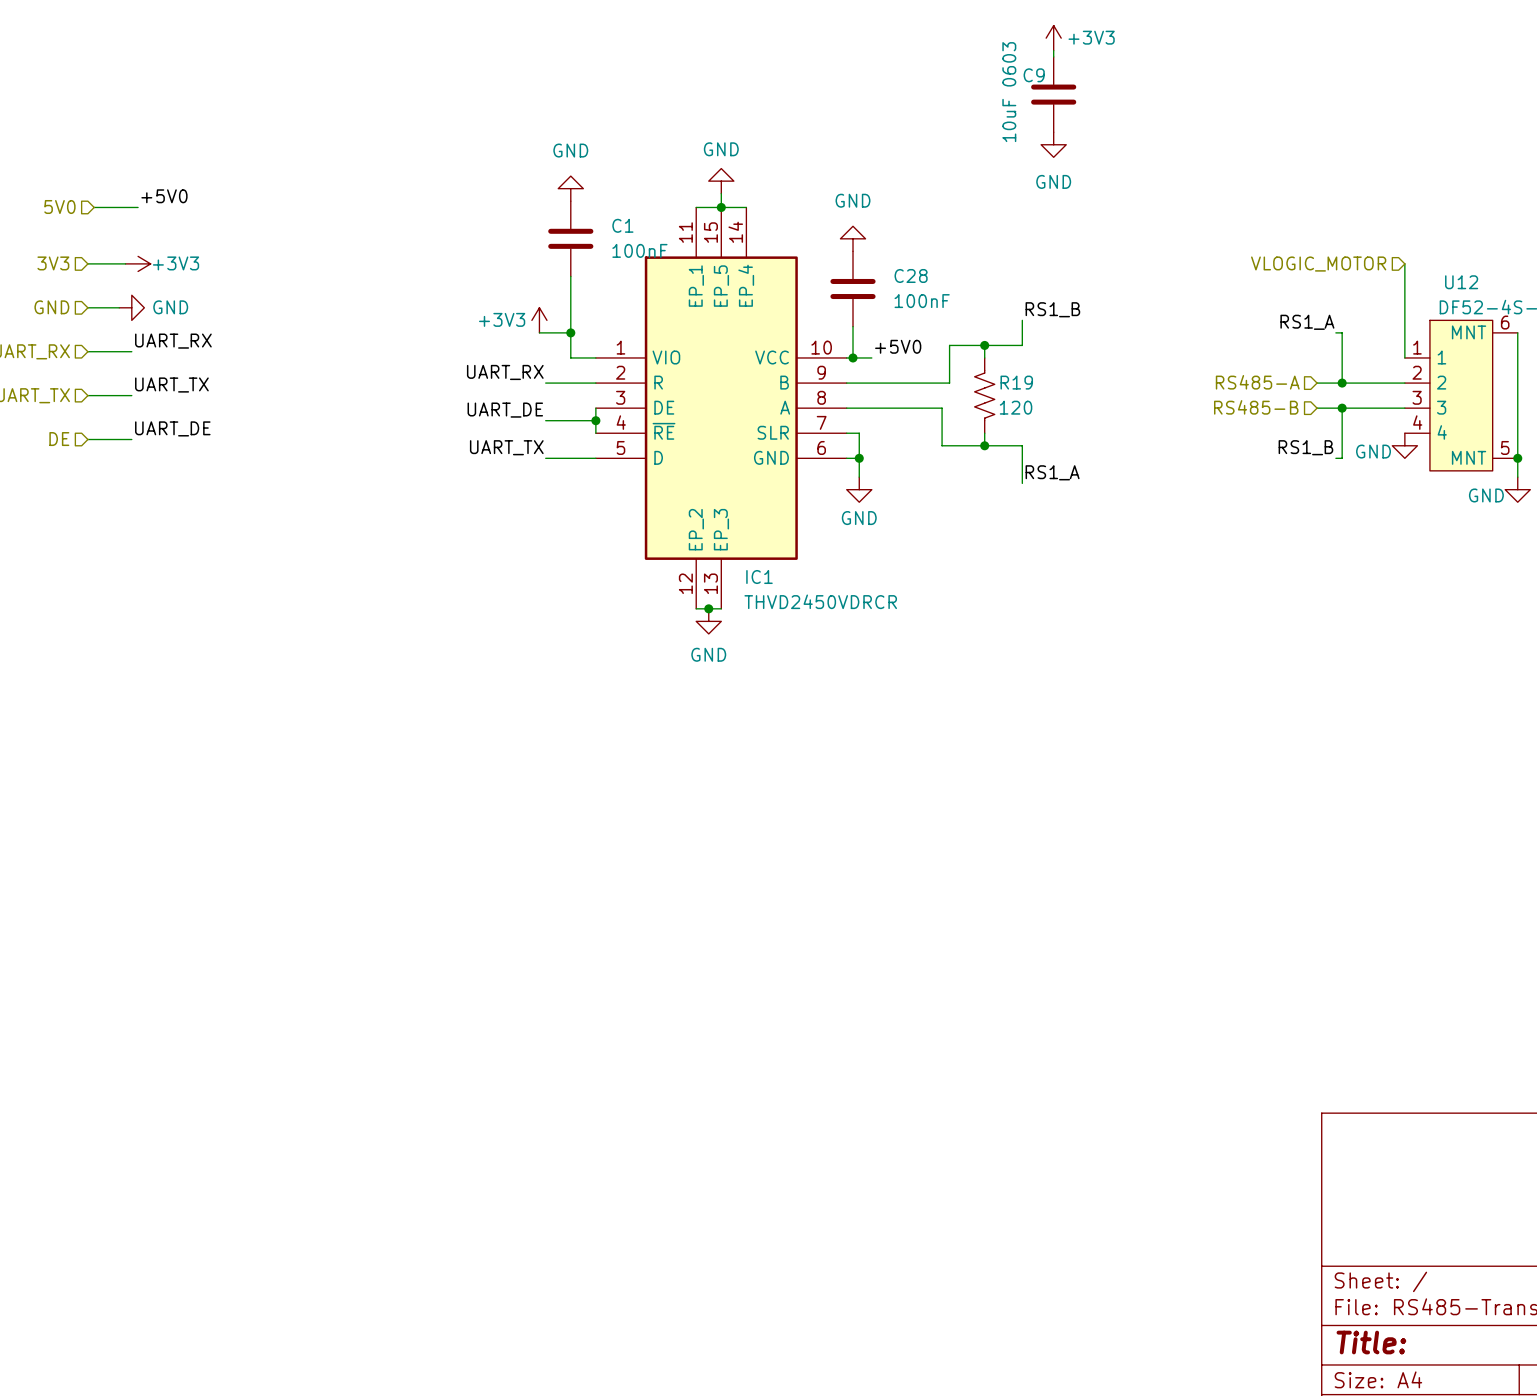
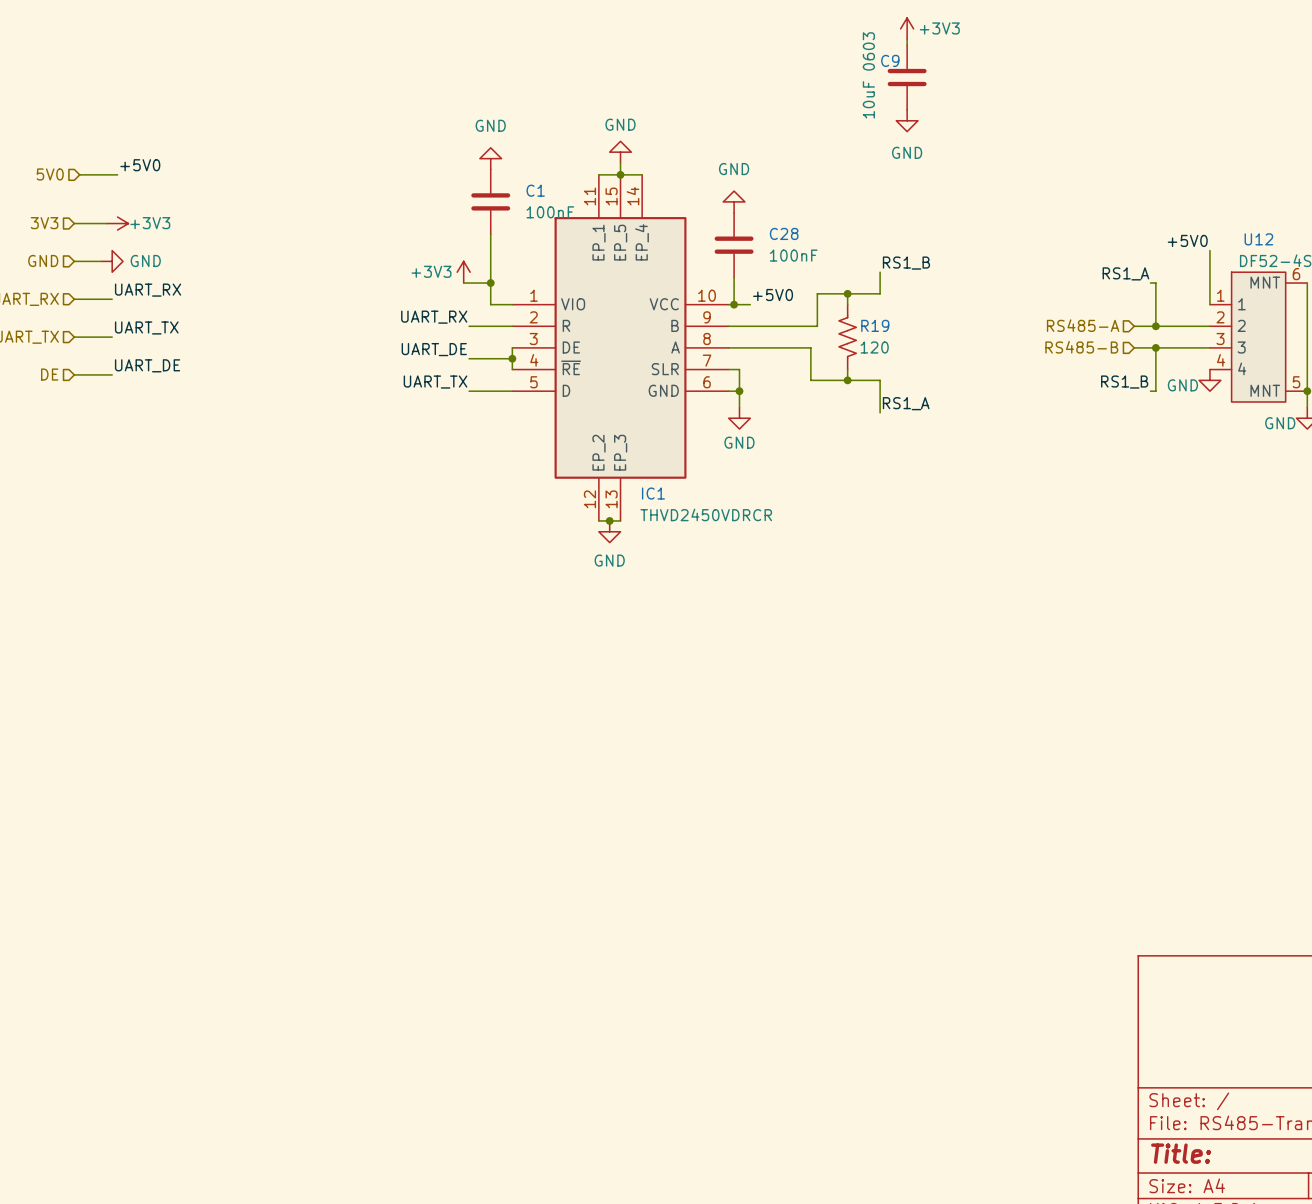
wire: (1404, 263) (1404, 295) -> none
hierarchical label: VLOGIC_MOTOR (1318, 264) -> none
label: none -> +5V0 (1187, 240)

